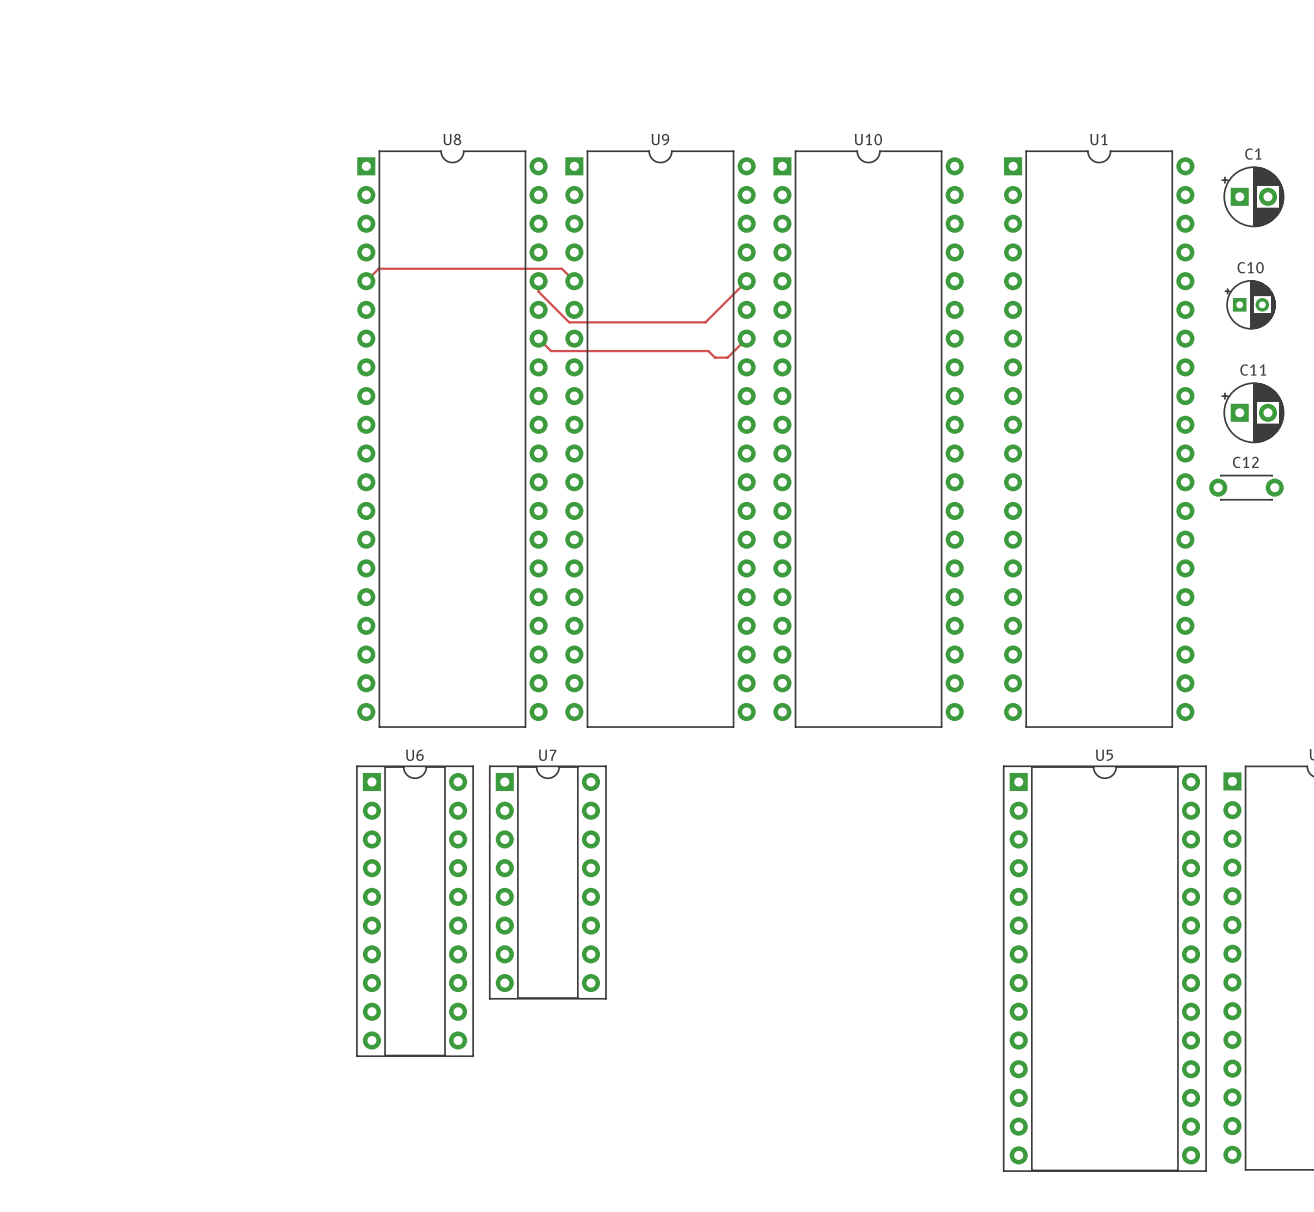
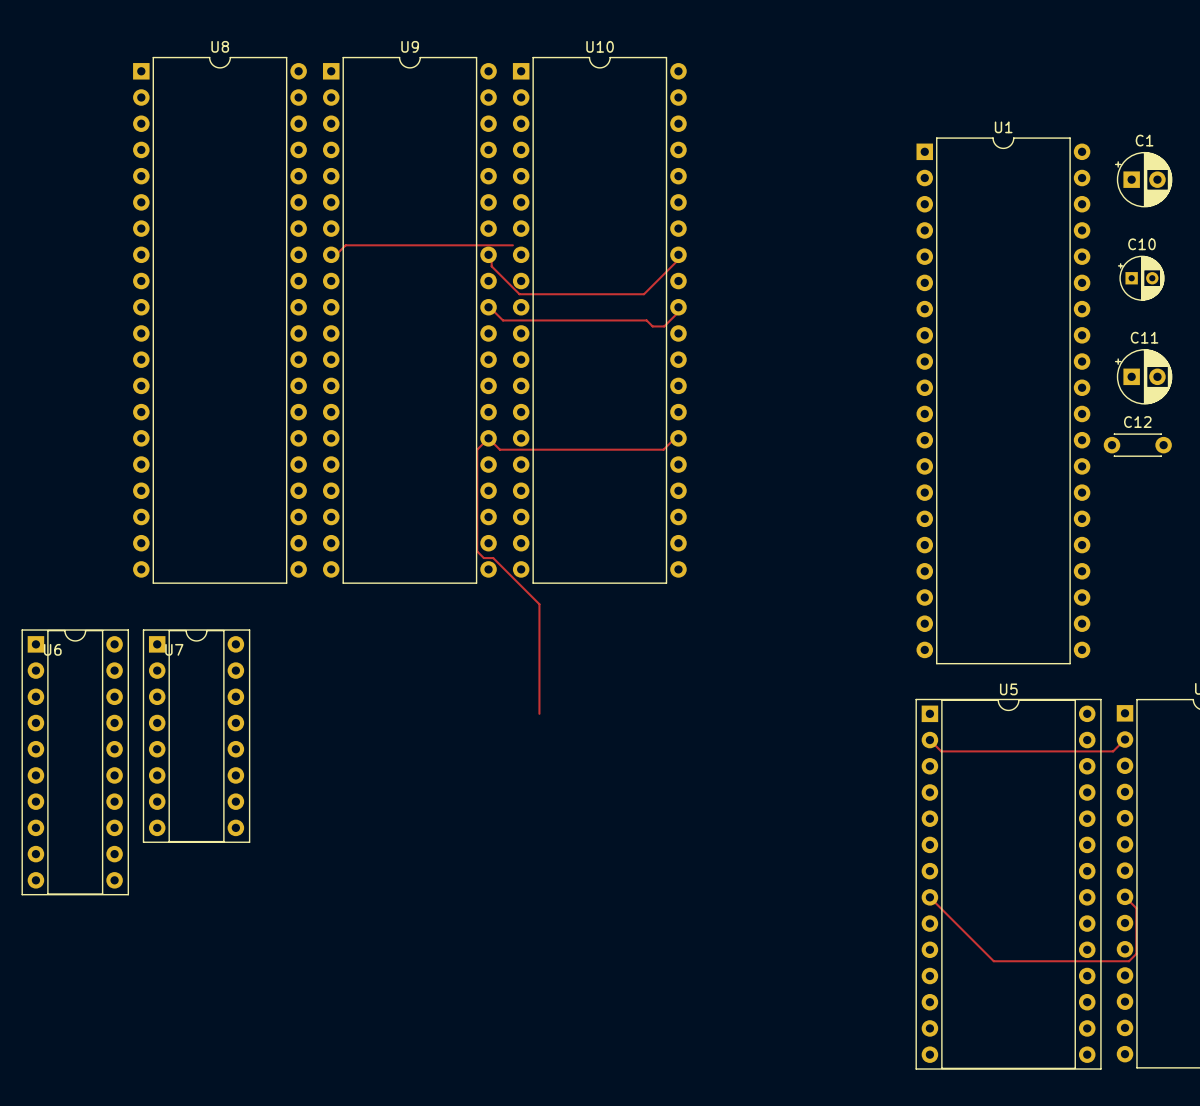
top track: (561, 268) (574, 281) -> none
U8 position: (452, 439) -> (219, 320)
U9 position: (660, 439) -> (409, 320)
U10 position: (868, 439) -> (599, 320)
top track: none -> (678, 438) (674, 438) (663, 449) (499, 449) (488, 438) (477, 449) (477, 551) (483, 558) (493, 558) (539, 604) (539, 713)
U6 name position: U6 (414, 755) -> U6 (52, 649)
U7 name position: U7 (547, 755) -> U7 (174, 649)
top track: none -> (1125, 739) (1113, 751) (941, 751) (929, 740)
U7 position: (547, 882) -> (196, 736)
U6 position: (415, 911) -> (75, 762)
top track: none -> (1125, 896) (1136, 908) (1136, 953) (1129, 961) (993, 961) (929, 897)

